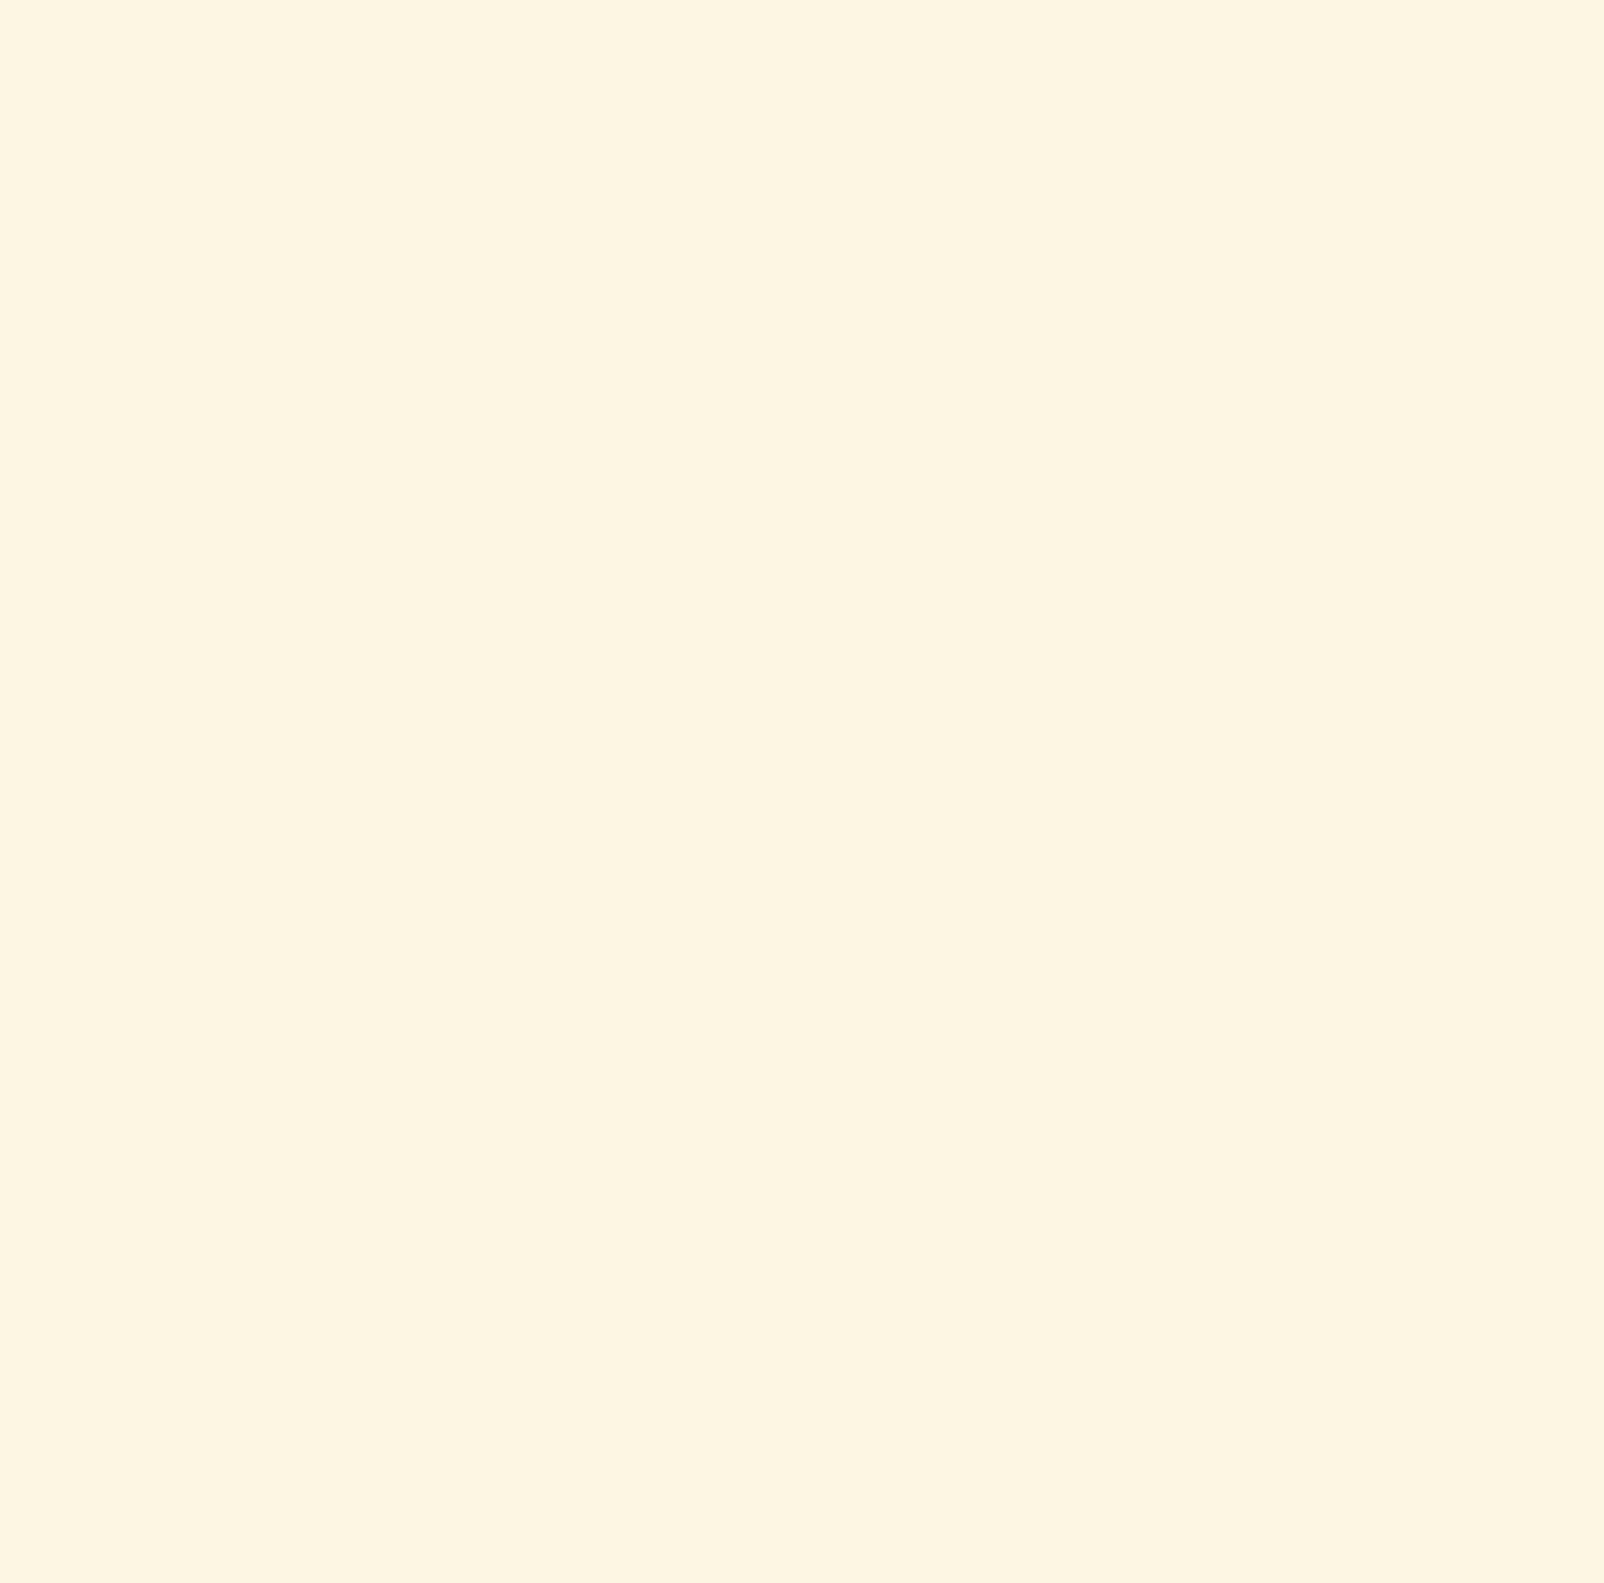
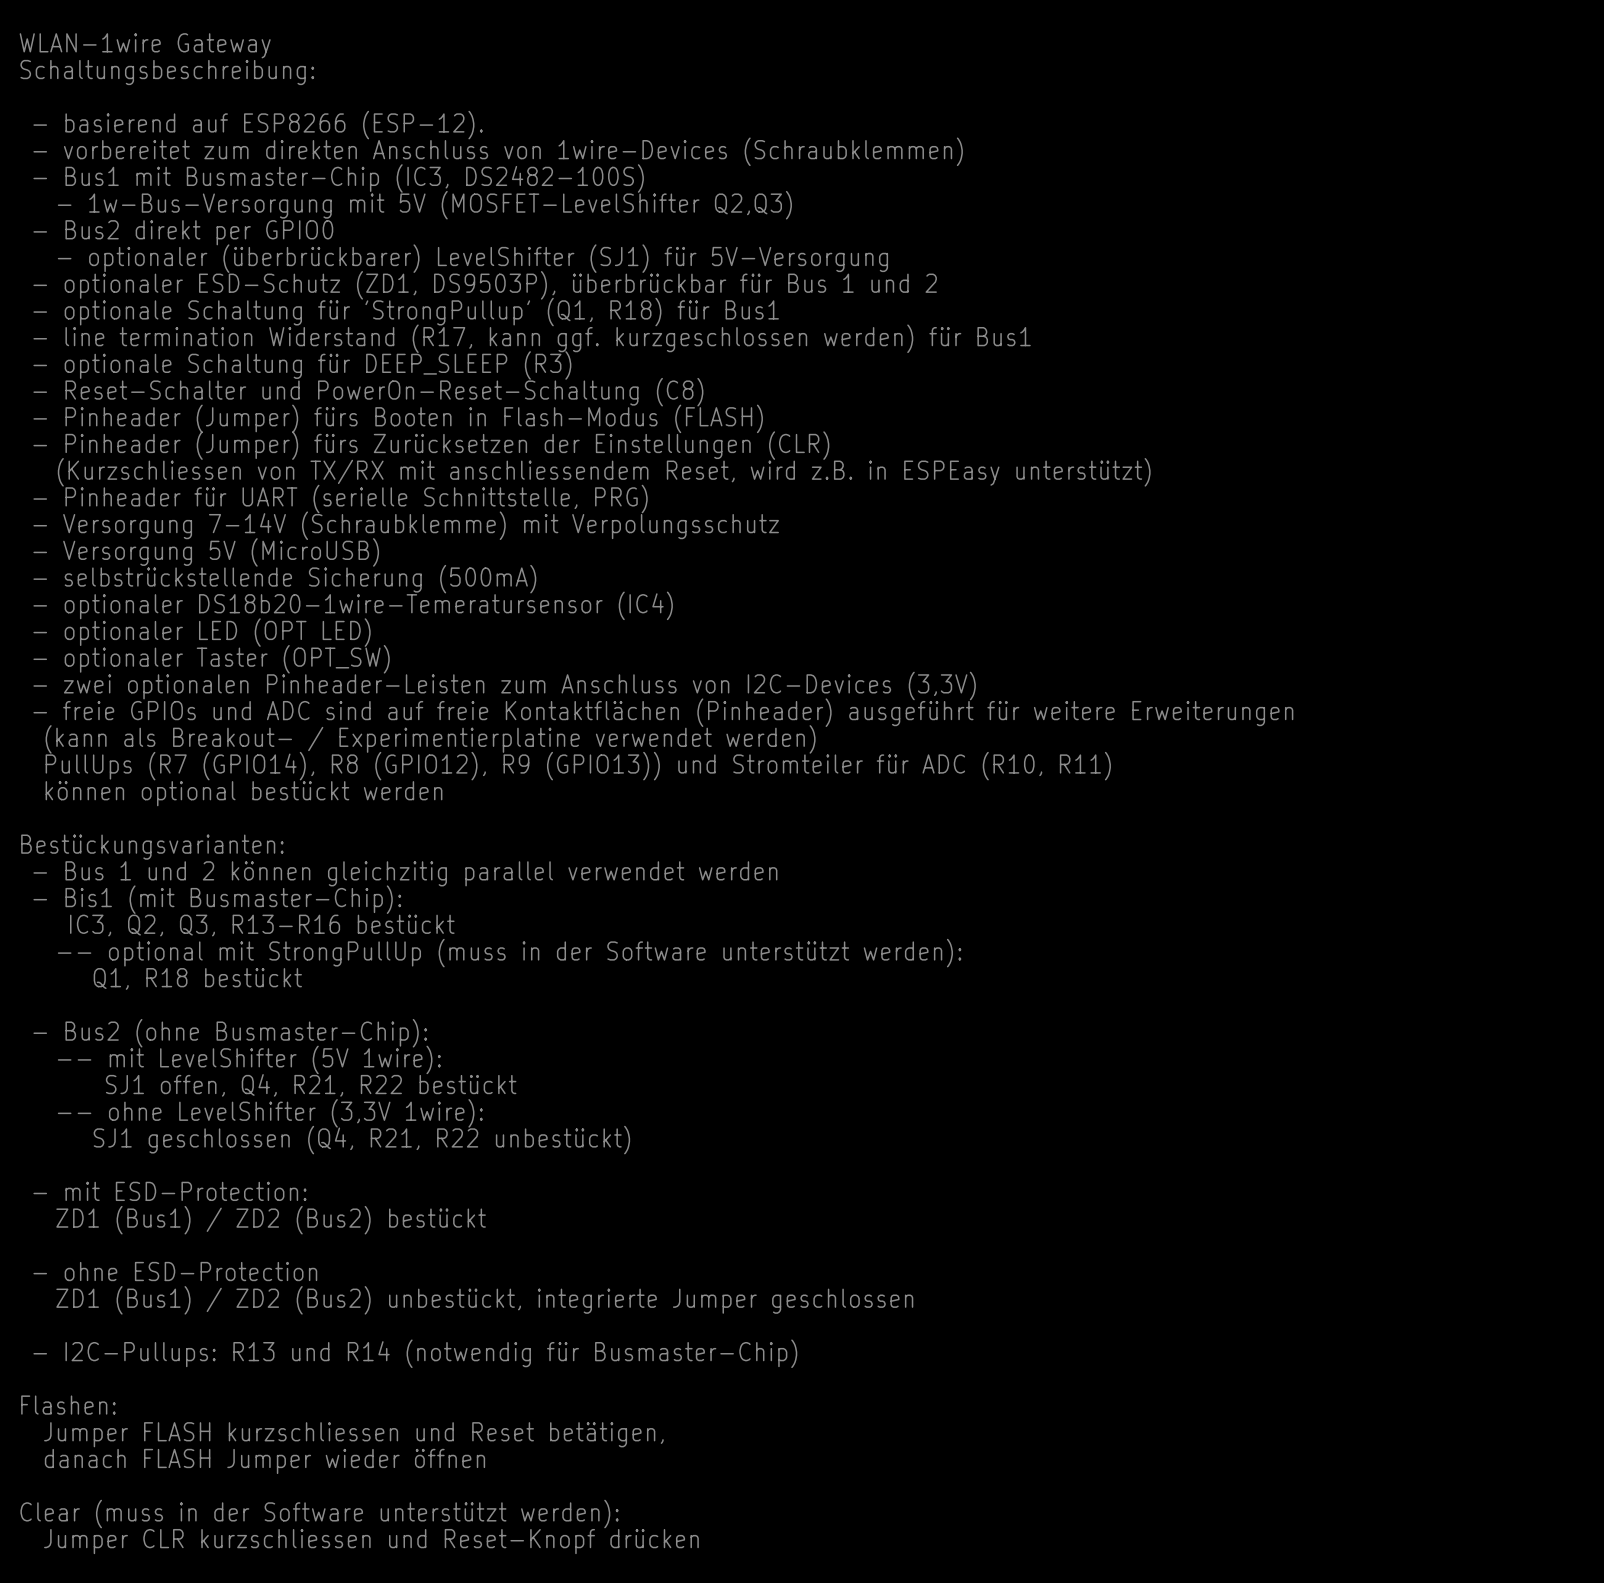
text: none -> WLAN-1wire Gateway (145, 45)
text: none -> Schaltungsbeschreibung: (167, 72)
text: none -> - basierend auf ESP8266 (ESP-12). (258, 125)
text: none -> - vorbereitet zum direkten Anschluss von 1wire-Devices (Schraubklemmen) (498, 151)
text: none -> - Bus1 mit Busmaster-Chip (IC3, DS2482-100S) (338, 178)
text: none -> - 1w-Bus-Versorgung mit 5V (MOSFET-LevelShifter Q2,Q3) (424, 205)
text: none -> - Bus2 direkt per GPIO0 (183, 232)
text: none -> - optionaler (überbrückbarer) LevelShifter (SJ1) für 5V-Versorgung (472, 258)
text: none -> - optionaler ESD-Schutz (ZD1, DS9503P), überbrückbar für Bus 1 und 2 (485, 285)
text: none -> - optionale Schaltung für 'StrongPullup' (Q1, R18) für Bus1 (406, 312)
text: none -> - line termination Widerstand (R17, kann ggf. kurzgeschlossen werden) für Bus1 (532, 338)
text: none -> - optionale Schaltung für DEEP_SLEEP (R3) (302, 365)
text: none -> - Reset-Schalter und PowerOn-Reset-Schaltung (C8) (368, 392)
text: none -> - Pinheader (Jumper) fürs Booten in Flash-Modus (FLASH) (398, 418)
text: none -> - Pinheader (Jumper) fürs Zurücksetzen der Einstellungen (CLR) (431, 445)
text: none -> (Kurzschliessen von TX/RX mit anschliessendem Reset, wird z.B. in ESPEasy unterstützt) (604, 472)
text: none -> - Pinheader für UART (serielle Schnittstelle, PRG) (340, 499)
text: none -> - Versorgung 7-14V (Schraubklemme) mit Verpolungsschutz (406, 525)
text: none -> - Versorgung 5V (MicroUSB) (206, 552)
text: none -> - selbstrückstellende Sicherung (500mA) (284, 579)
text: none -> - optionaler DS18b20-1wire-Temeratursensor (IC4) (353, 605)
text: none -> - optionaler LED (OPT LED) (202, 632)
text: none -> - optionaler Taster (OPT_SW) (211, 659)
text: none -> - zwei optionalen Pinheader-Leisten zum Anschluss von I2C-Devices (3,3V) (504, 685)
text: none -> - freie GPIOs und ADC sind auf freie Kontaktflächen (Pinheader) ausgeführt für weitere Erweiterungen (663, 712)
text: none -> (kann als Breakout- / Experimentierplatine verwendet werden) (430, 739)
text: none -> PullUps (R7 (GPIO14), R8 (GPIO12), R9 (GPIO13)) und Stromteiler für ADC (R10, R11) (578, 766)
text: none -> können optional bestückt werden (243, 793)
text: none -> Bestückungsvarianten: (152, 847)
text: none -> - Bus 1 und 2 können gleichzitig parallel verwendet werden (405, 873)
text: none -> - Bis1 (mit Busmaster-Chip): (217, 899)
text: none -> IC3, Q2, Q3, R13-R16 bestückt (262, 925)
text: none -> -- optional mit StrongPullUp (muss in der Software unterstützt werden): (509, 953)
text: none -> Q1, R18 bestückt (197, 978)
text: none -> - Bus2 (ohne Busmaster-Chip): (230, 1033)
text: none -> -- mit LevelShifter (5V 1wire): (249, 1059)
text: none -> SJ1 offen, Q4, R21, R22 bestückt (311, 1085)
text: none -> -- ohne LevelShifter (3,3V 1wire): (270, 1113)
text: none -> SJ1 geschlossen (Q4, R21, R22 unbestückt) (361, 1140)
text: none -> - mit ESD-Protection: (169, 1191)
text: none -> ZD1 (Bus1) / ZD2 (Bus2) bestückt (271, 1220)
text: none -> - ohne ESD-Protection (175, 1271)
text: none -> ZD1 (Bus1) / ZD2 (Bus2) unbestückt, integrierte Jumper geschlossen (484, 1300)
text: none -> - I2C-Pullups: R13 und R14 (notwendig für Busmaster-Chip) (415, 1353)
text: none -> Flashen: (68, 1405)
text: none -> Jumper FLASH kurzschliessen und Reset betätigen, (353, 1434)
text: none -> danach FLASH Jumper wieder öffnen (264, 1461)
text: none -> Clear (muss in der Software unterstützt werden): (319, 1514)
text: none -> Jumper CLR kurzschliessen und Reset-Knopf drücken (371, 1541)

